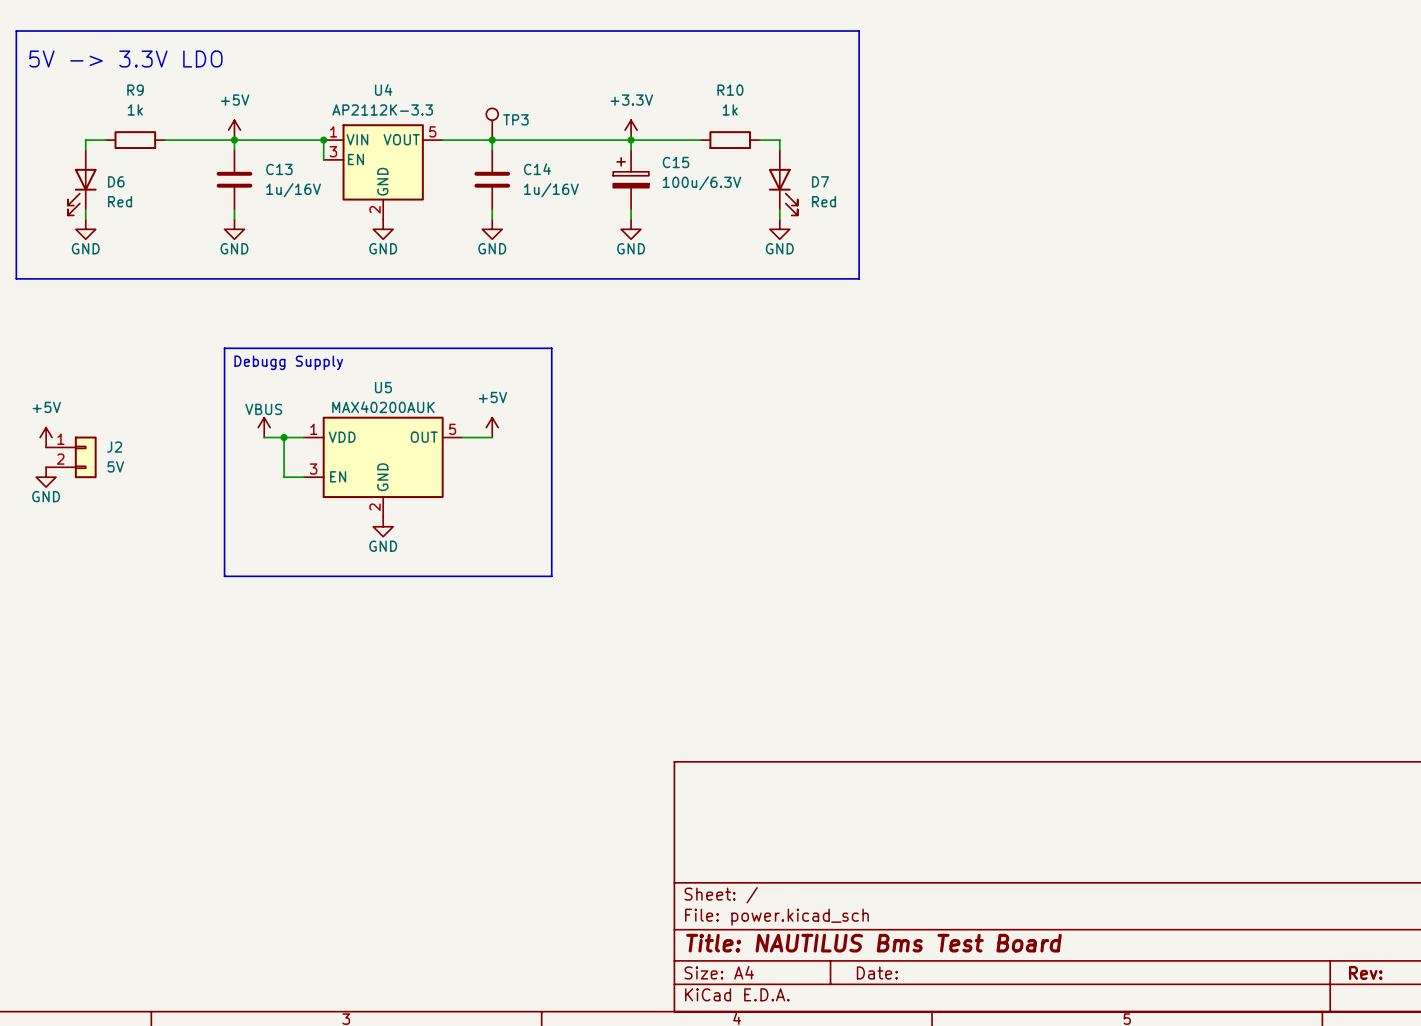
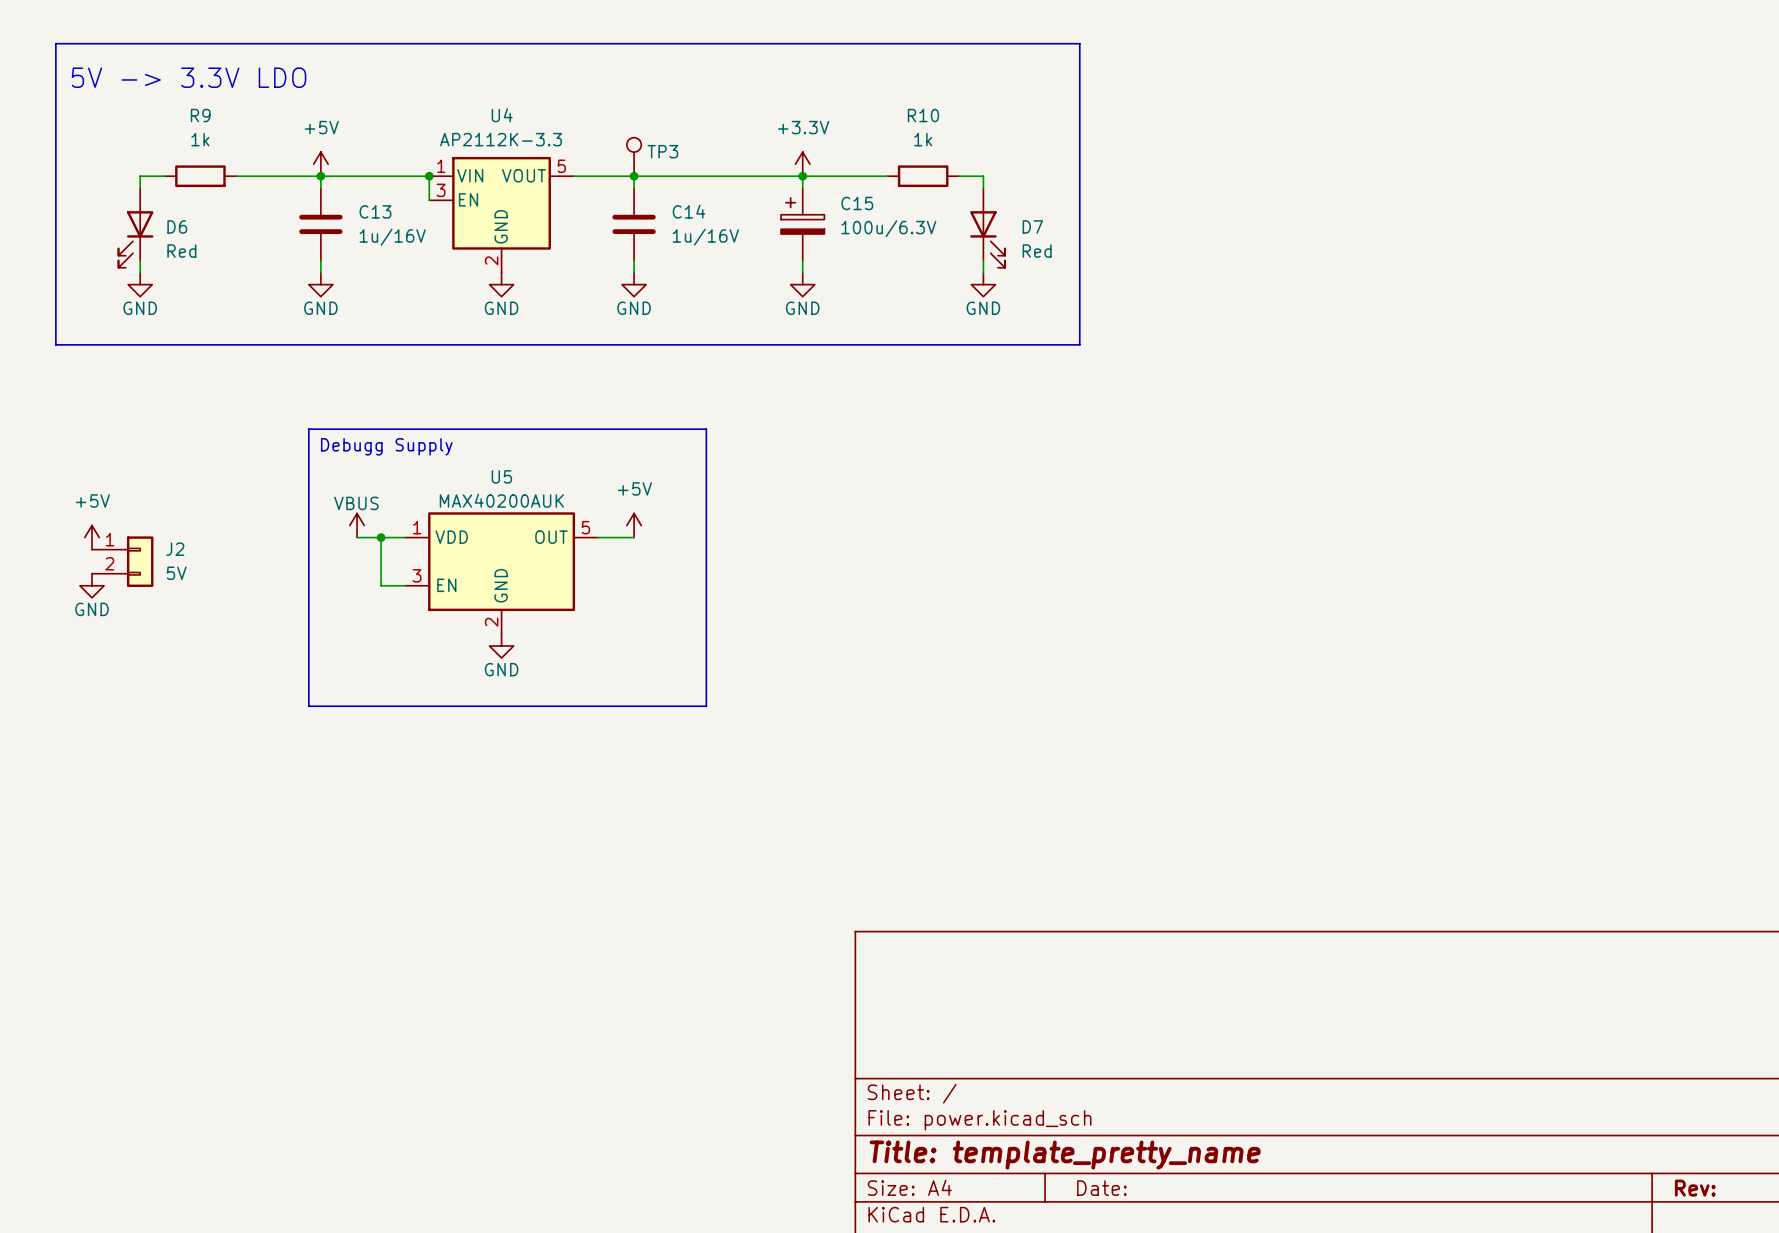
title block: Title: NAUTILUS Bms Test Board (873, 943) -> Title: template_pretty_name (1065, 1155)

